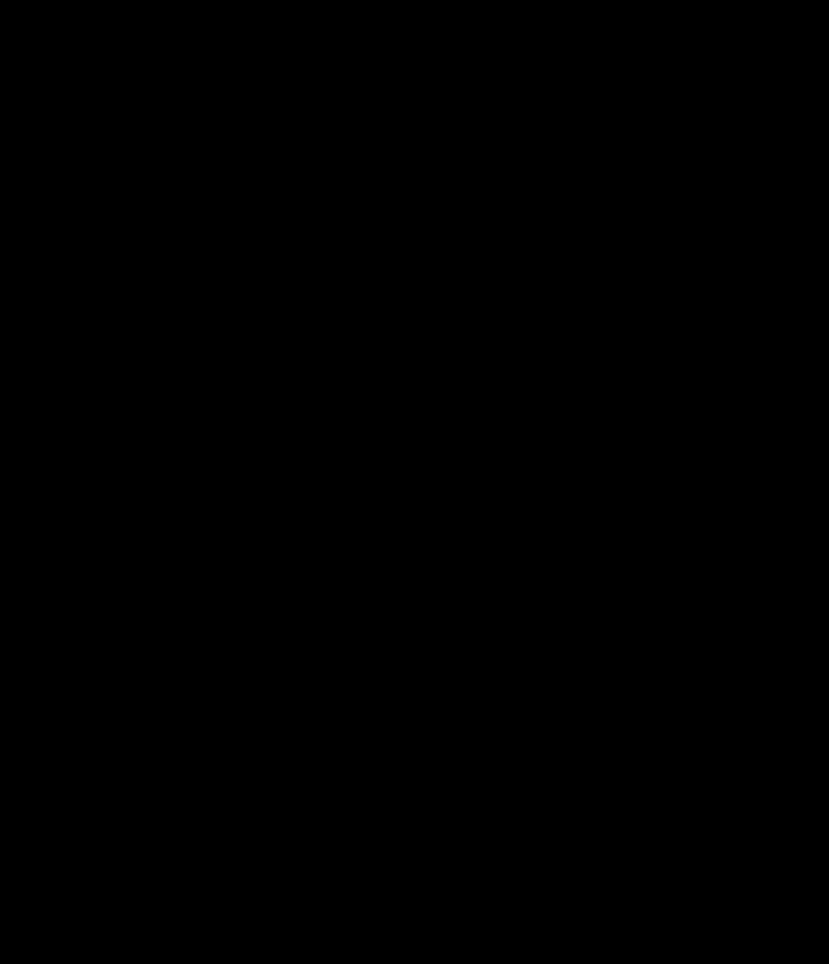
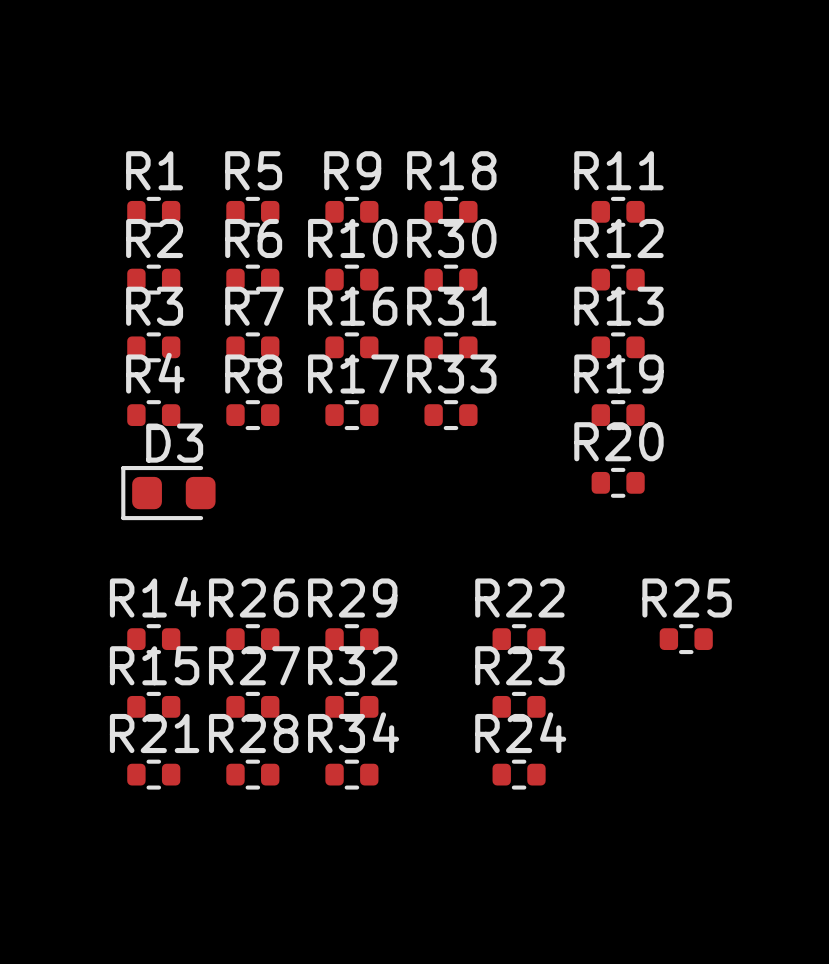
R1: none -> (153, 211)
R5: none -> (252, 211)
R9: none -> (351, 211)
R18: none -> (450, 211)
R11: none -> (618, 211)
R2: none -> (153, 279)
R6: none -> (252, 279)
R10: none -> (351, 279)
R30: none -> (450, 279)
R12: none -> (618, 279)
R3: none -> (153, 347)
R7: none -> (252, 347)
R16: none -> (351, 347)
R31: none -> (450, 347)
R13: none -> (618, 347)
R4: none -> (153, 415)
R8: none -> (252, 415)
R17: none -> (351, 415)
R33: none -> (450, 415)
R19: none -> (618, 415)
R20: none -> (618, 482)
D3: none -> (168, 493)
R14: none -> (153, 639)
R26: none -> (252, 639)
R29: none -> (351, 639)
R22: none -> (519, 639)
R25: none -> (686, 639)
R15: none -> (153, 706)
R27: none -> (252, 706)
R32: none -> (351, 706)
R23: none -> (519, 706)
R21: none -> (153, 774)
R28: none -> (252, 774)
R34: none -> (351, 774)
R24: none -> (519, 774)

